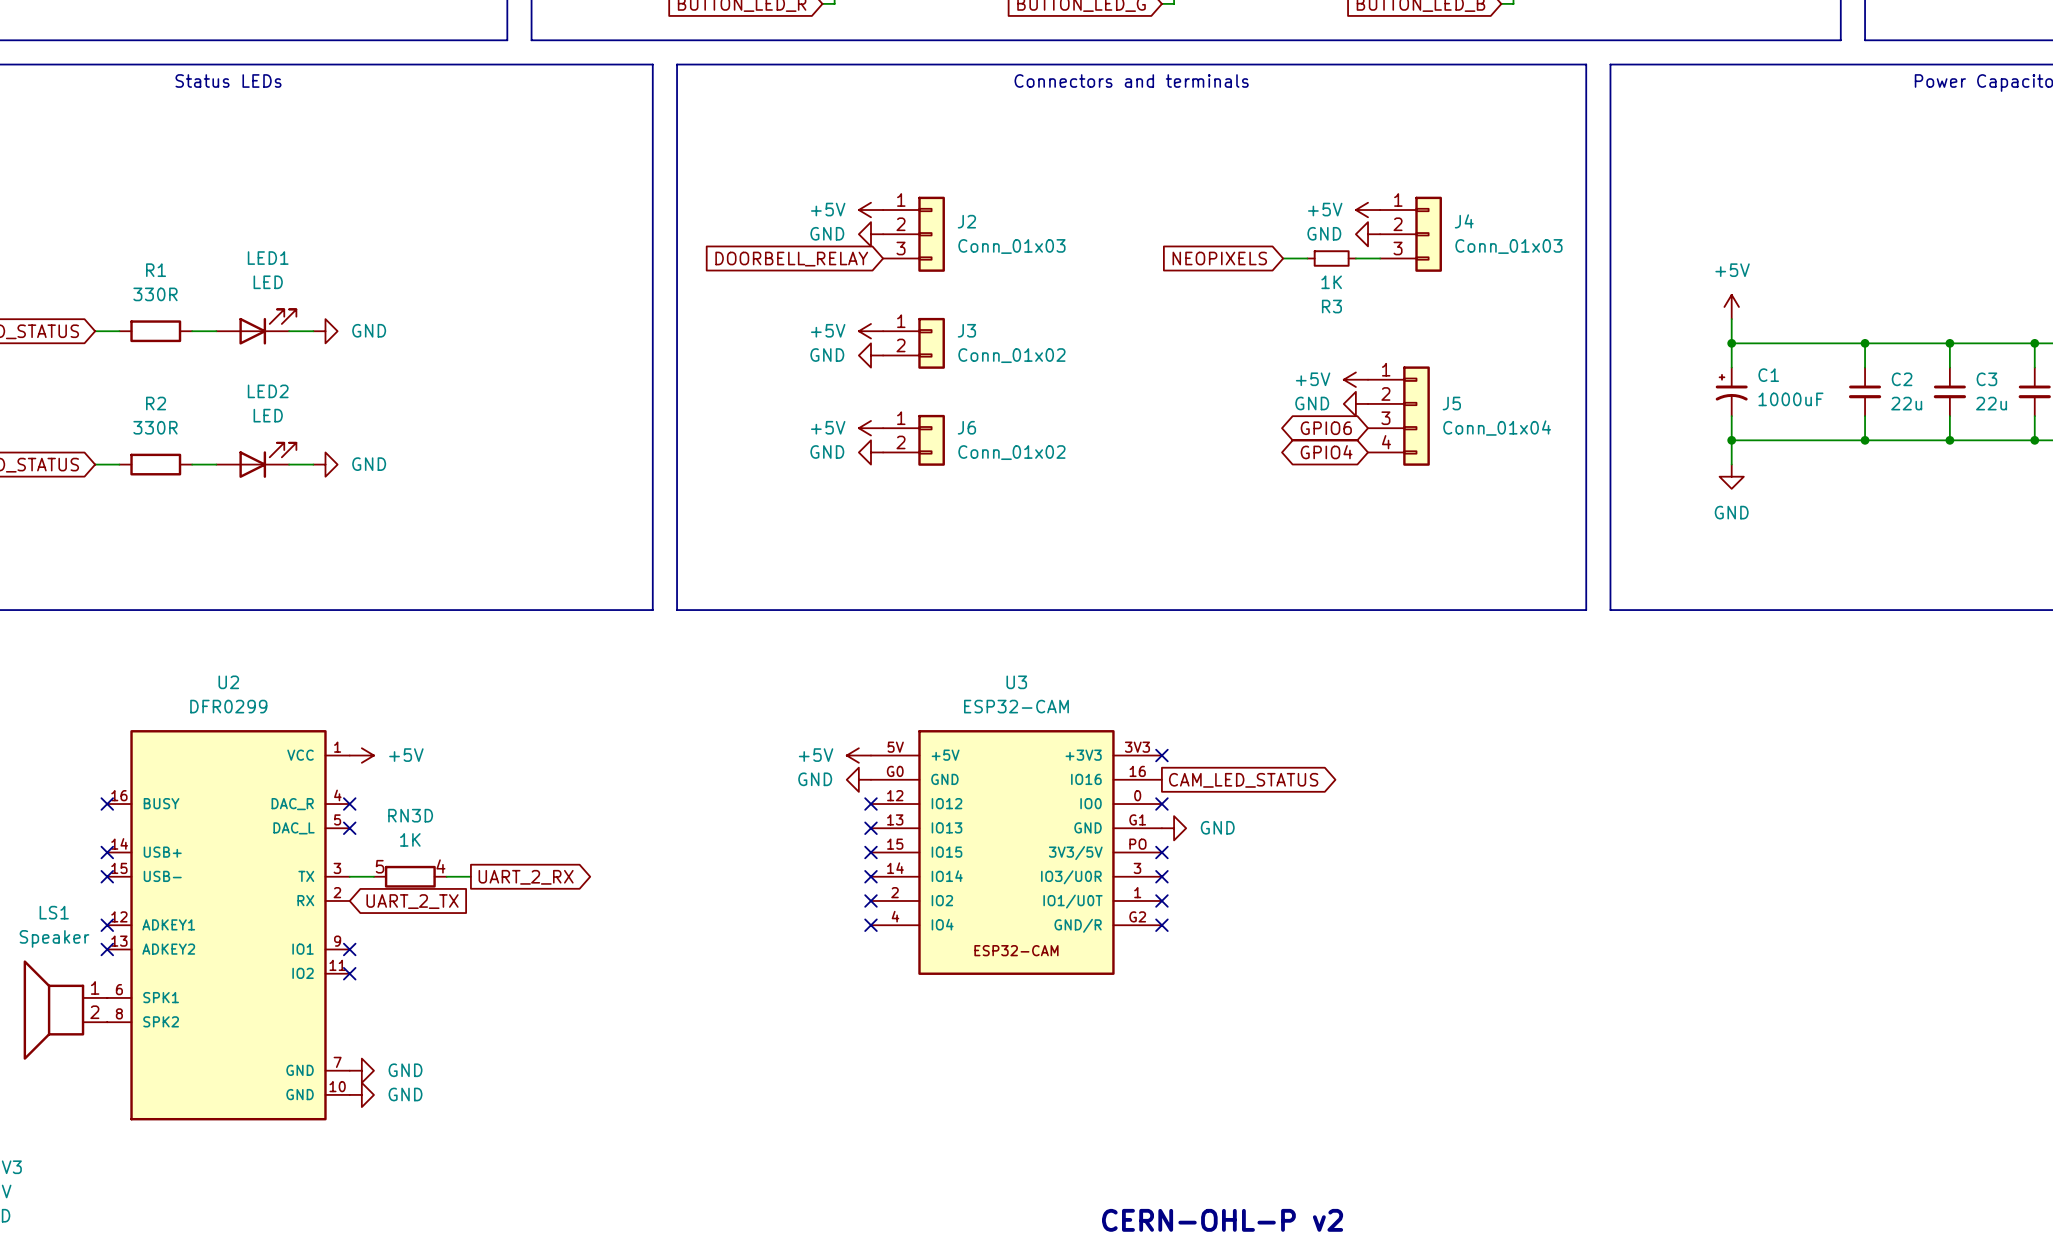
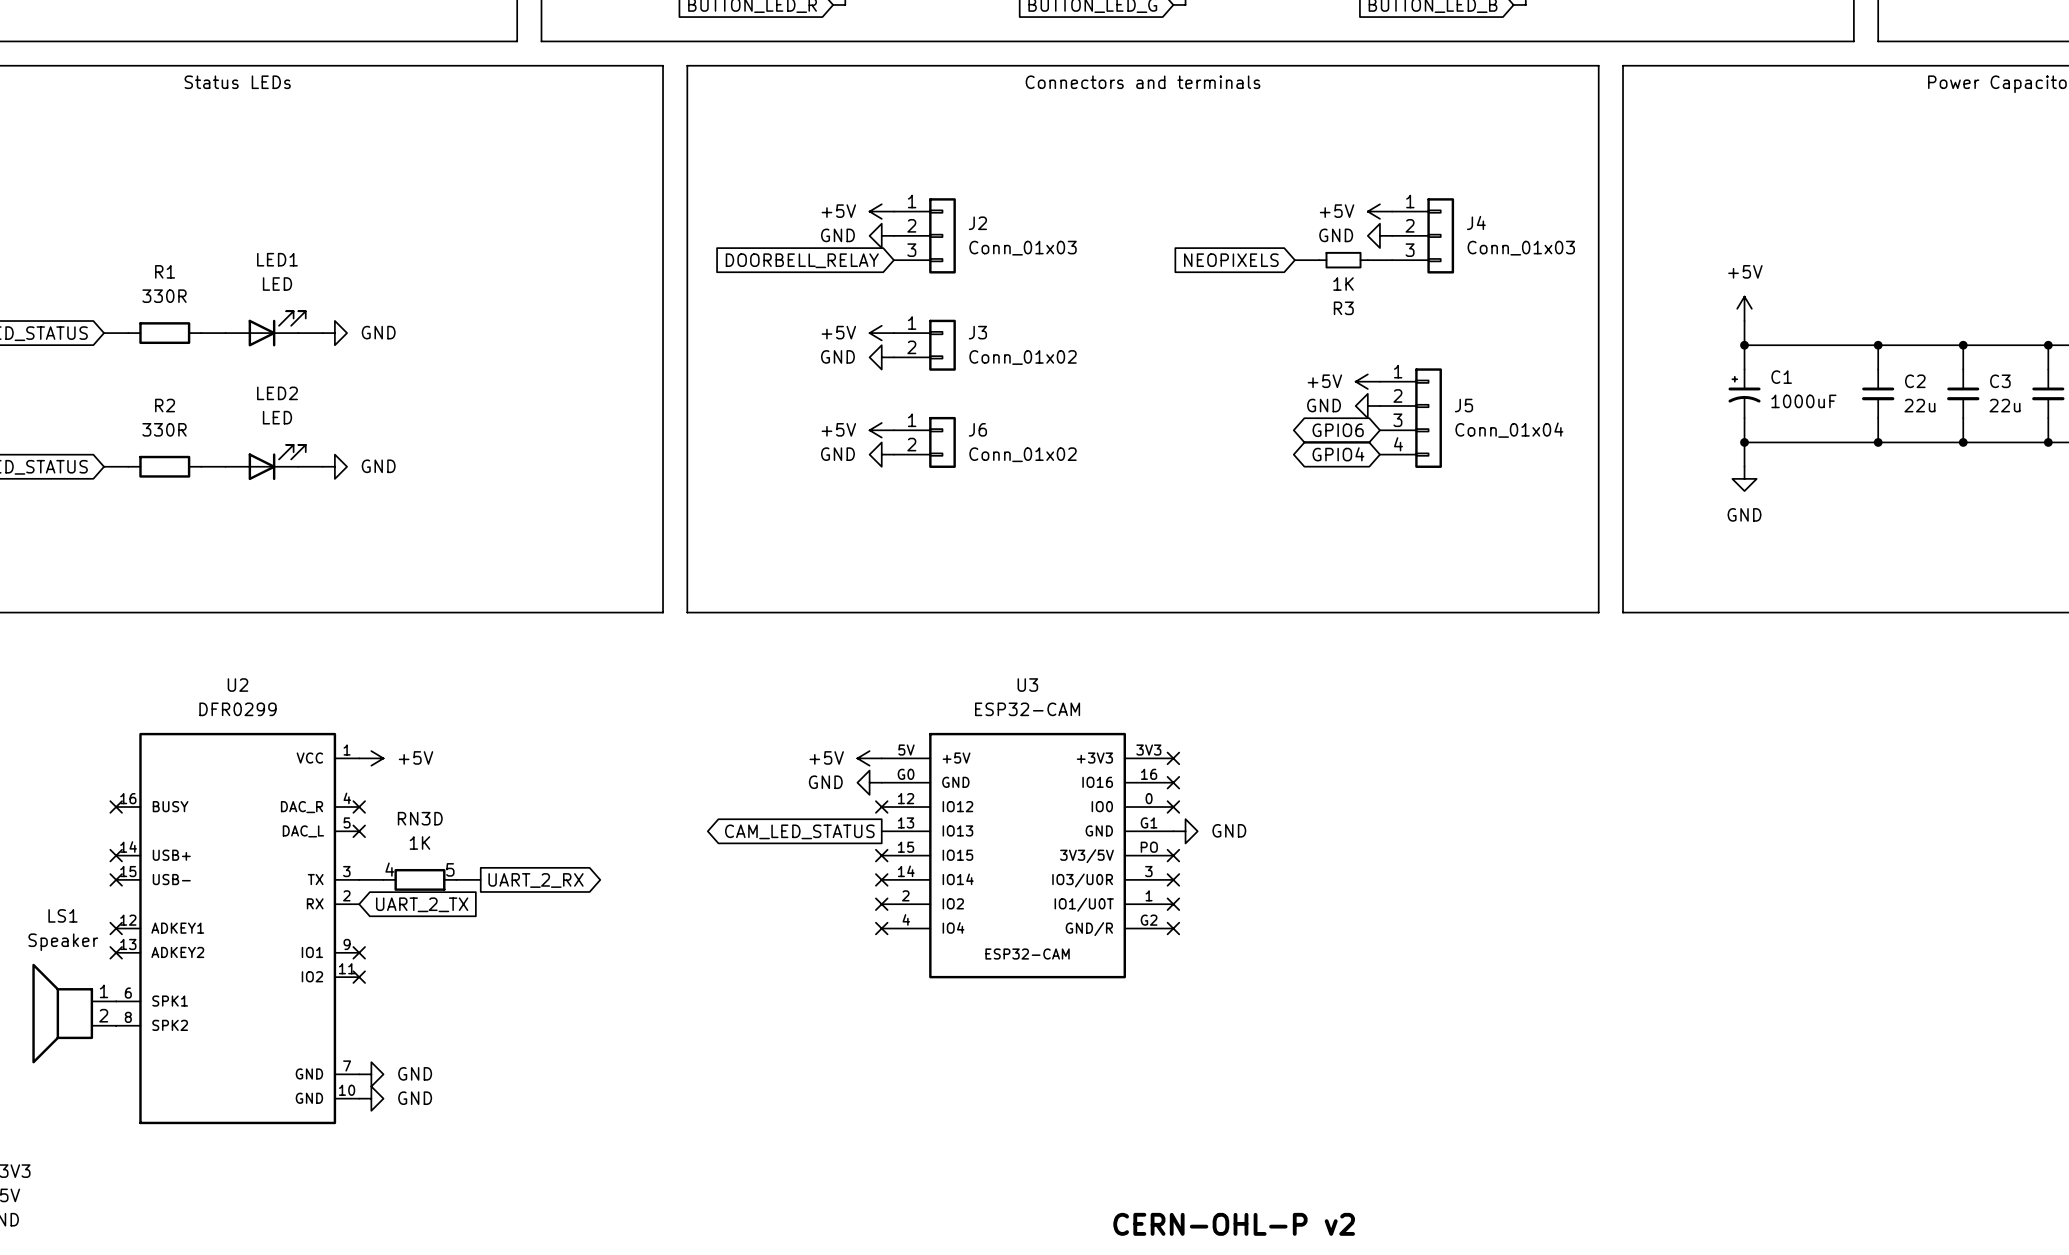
no-connect mark: none -> (1173, 782)
global label: CAM_LED_STATUS (1243, 780) -> none
global label: none -> CAM_LED_STATUS (799, 831)
no-connect mark: (870, 828) -> none
RN3D rotation: 0° (410, 876) -> 180° (419, 879)

